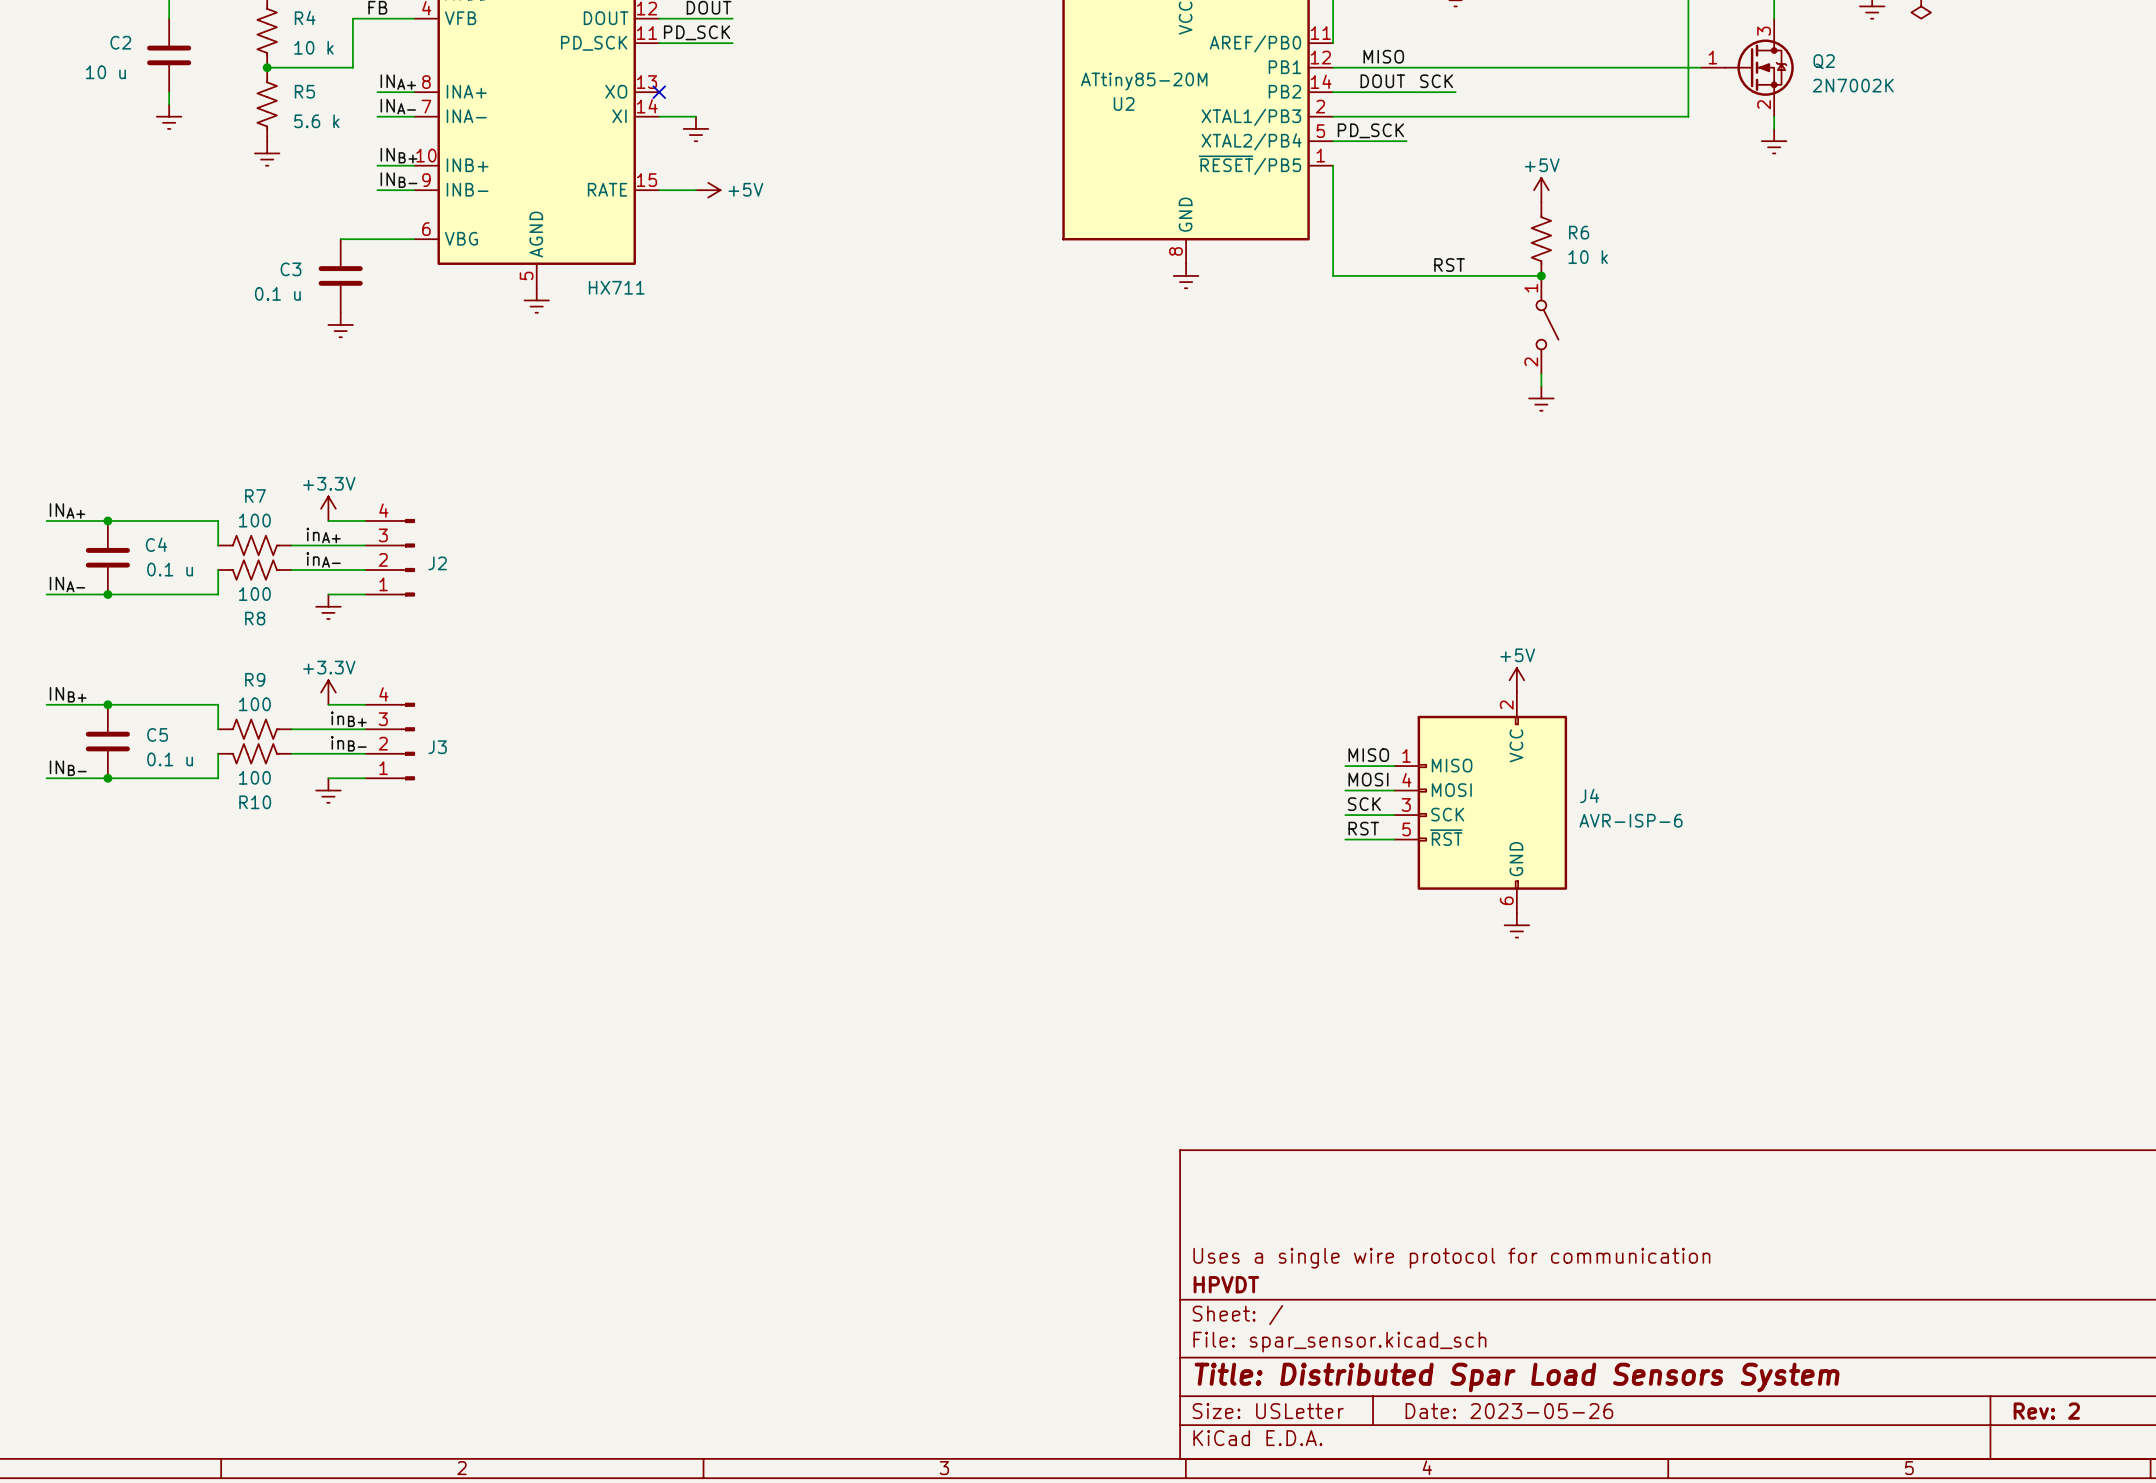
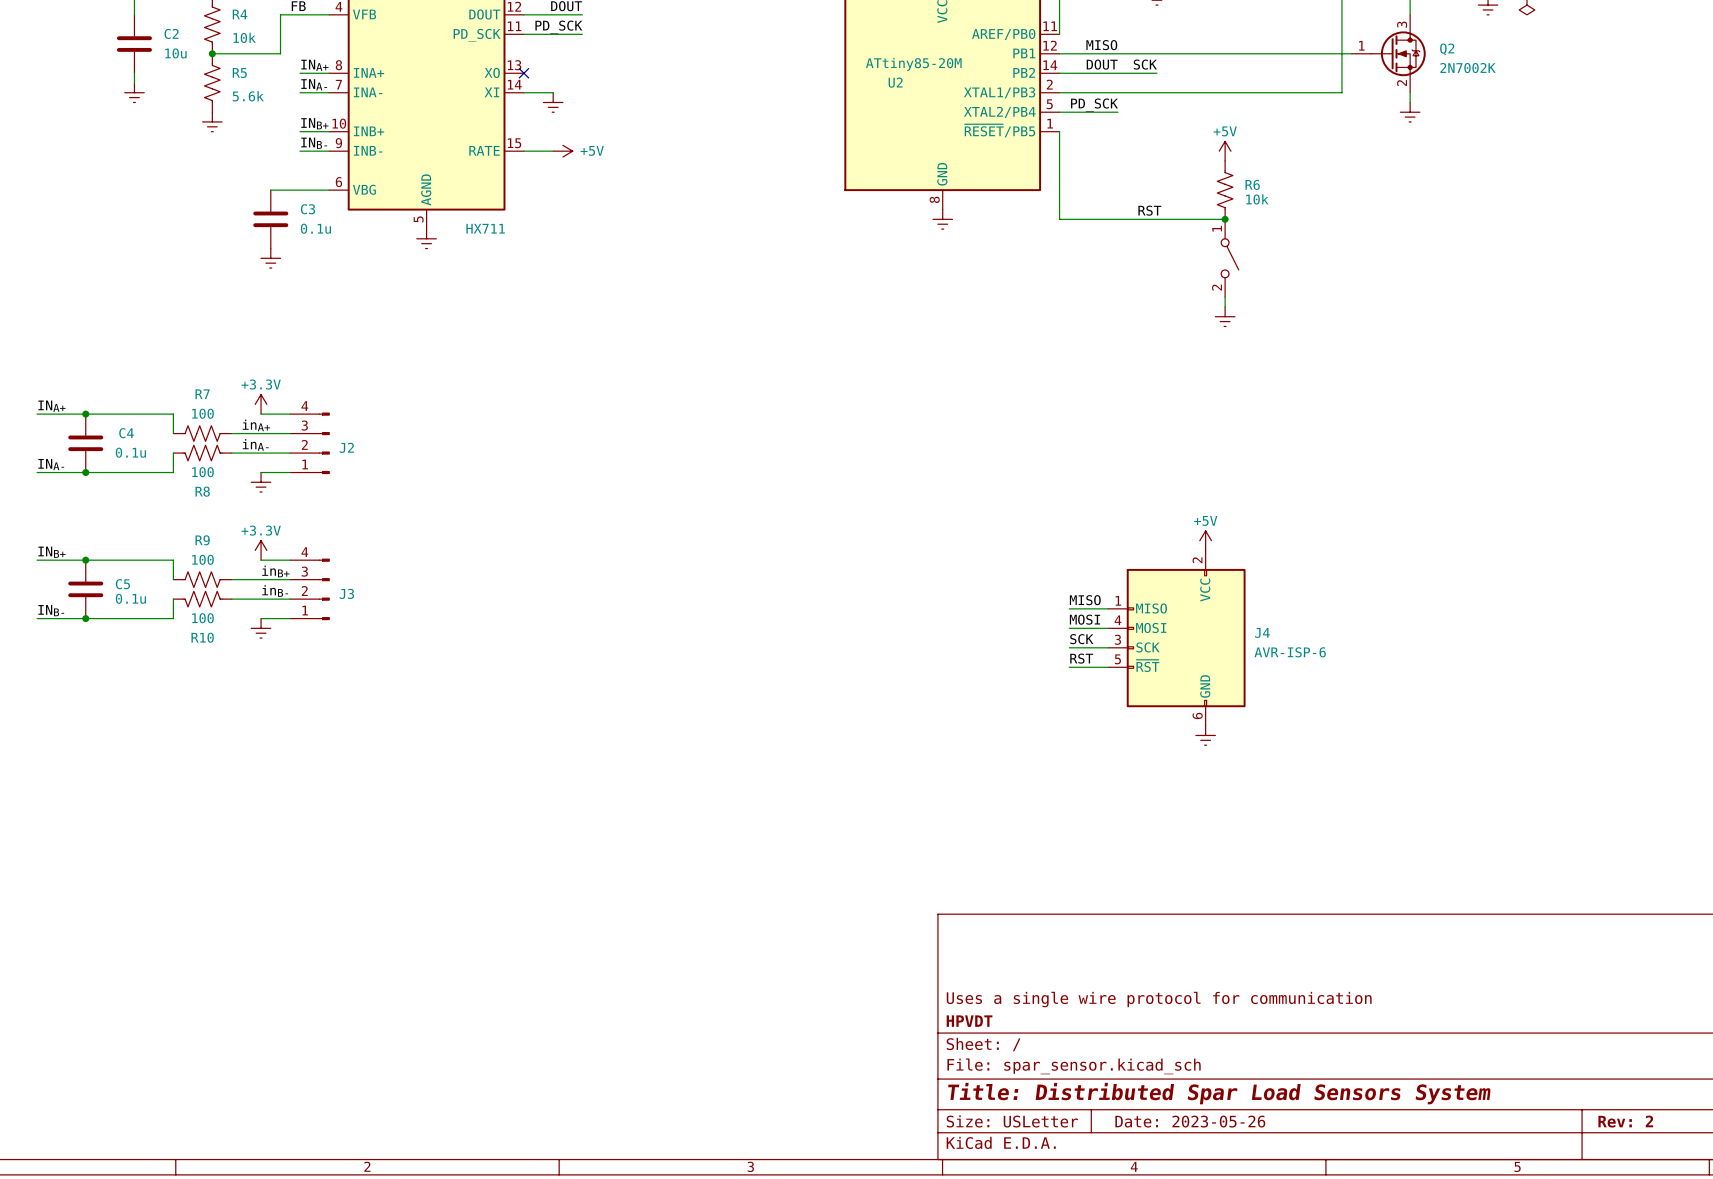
C2 name position: C2 (120, 42) -> C2 (171, 33)
R4 value: 10 k (313, 47) -> 10k (244, 37)
C2 value: 10 u (105, 72) -> 10u (175, 53)
R5 value: 5.6 k (316, 121) -> 5.6k (248, 96)
R6 value: 10 k (1588, 257) -> 10k (1257, 199)
C3 name position: C3 (291, 269) -> C3 (307, 209)
C3 value: 0.1 u (277, 293) -> 0.1u (315, 228)
C4 value: 0.1 u (170, 569) -> 0.1u (130, 452)
C5 value: 0.1 u (170, 759) -> 0.1u (130, 598)

